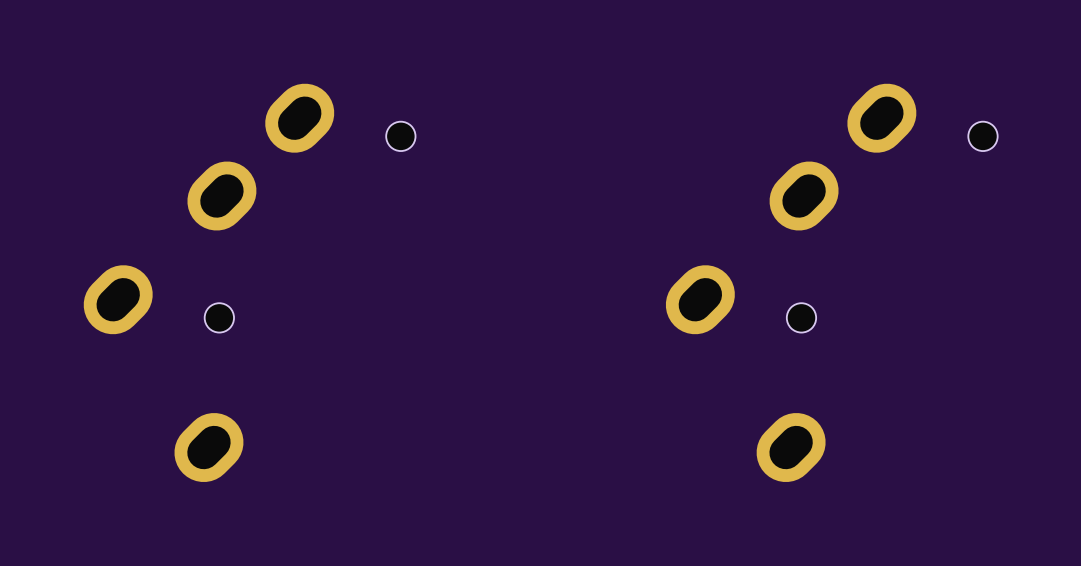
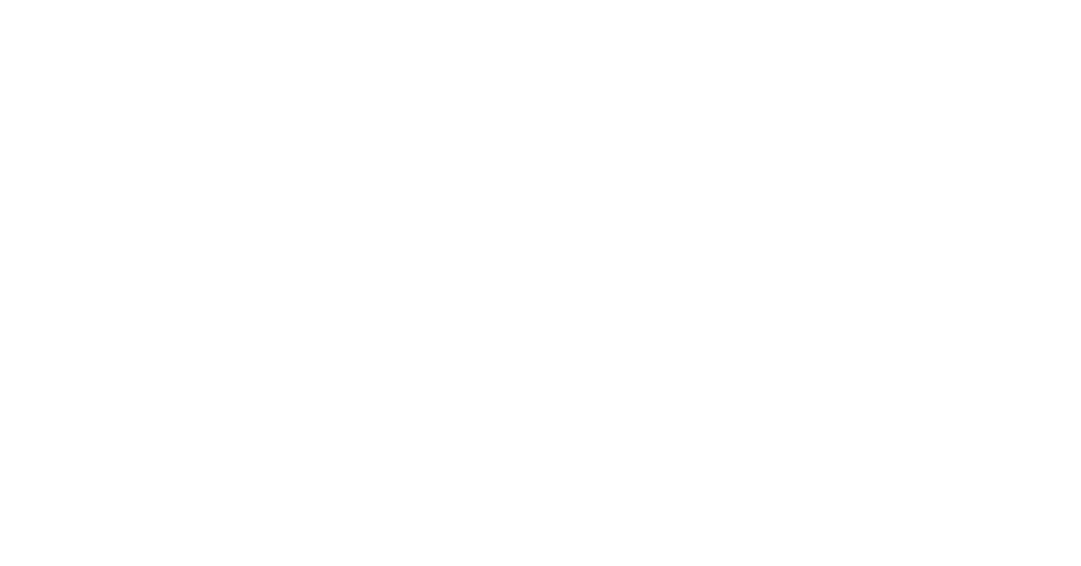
part: (249, 282) -> none
part: (831, 282) -> none

